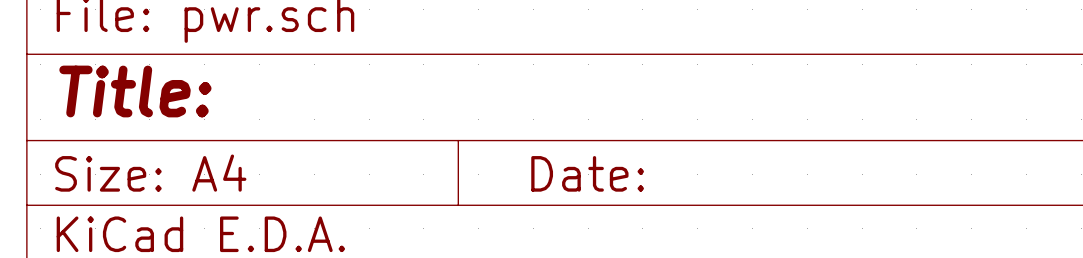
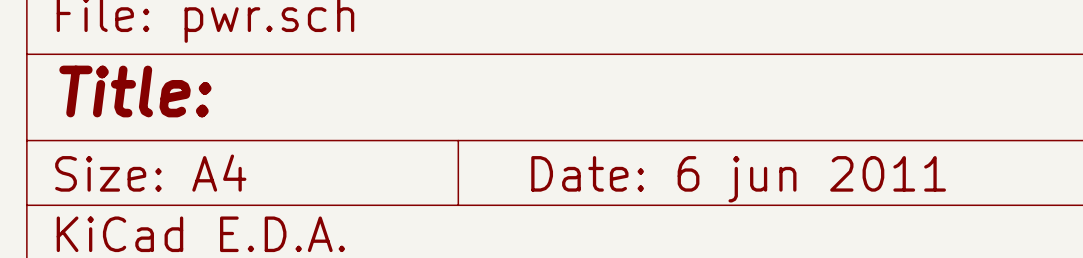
title block: Date: (587, 173) -> Date: 6 jun 2011 (738, 179)

